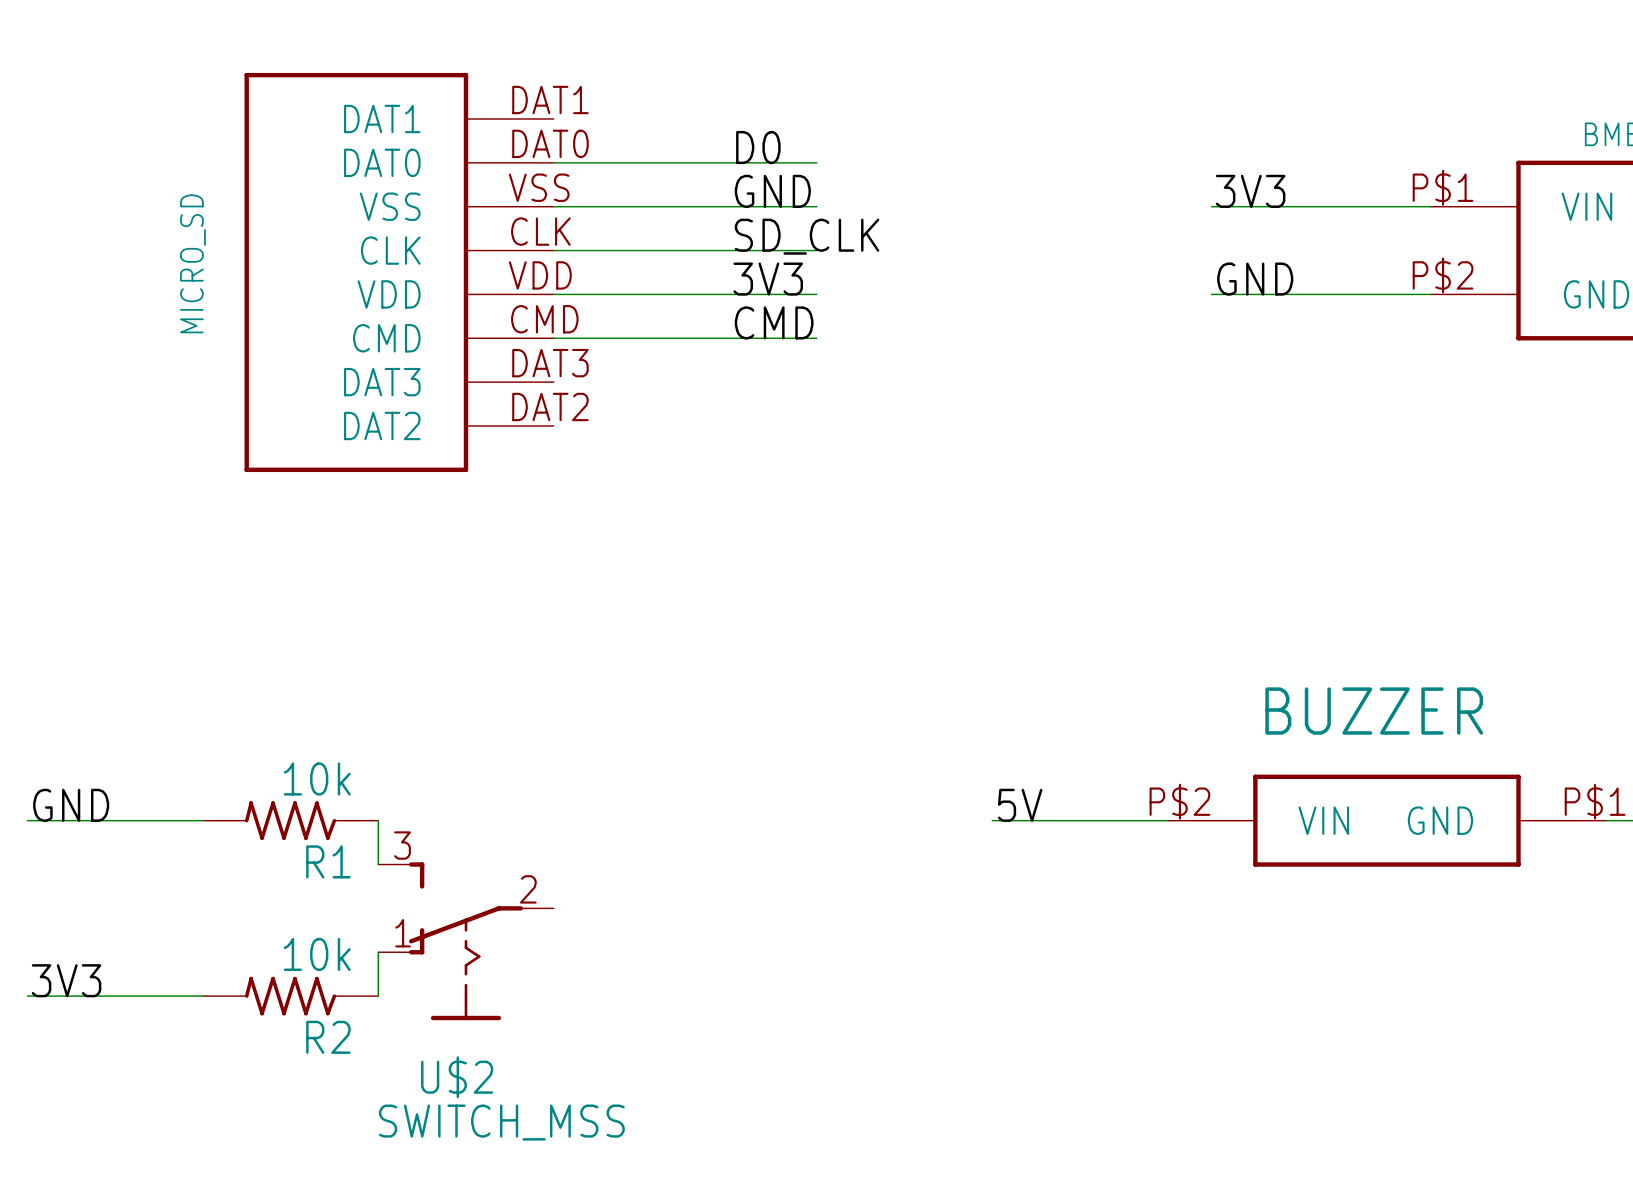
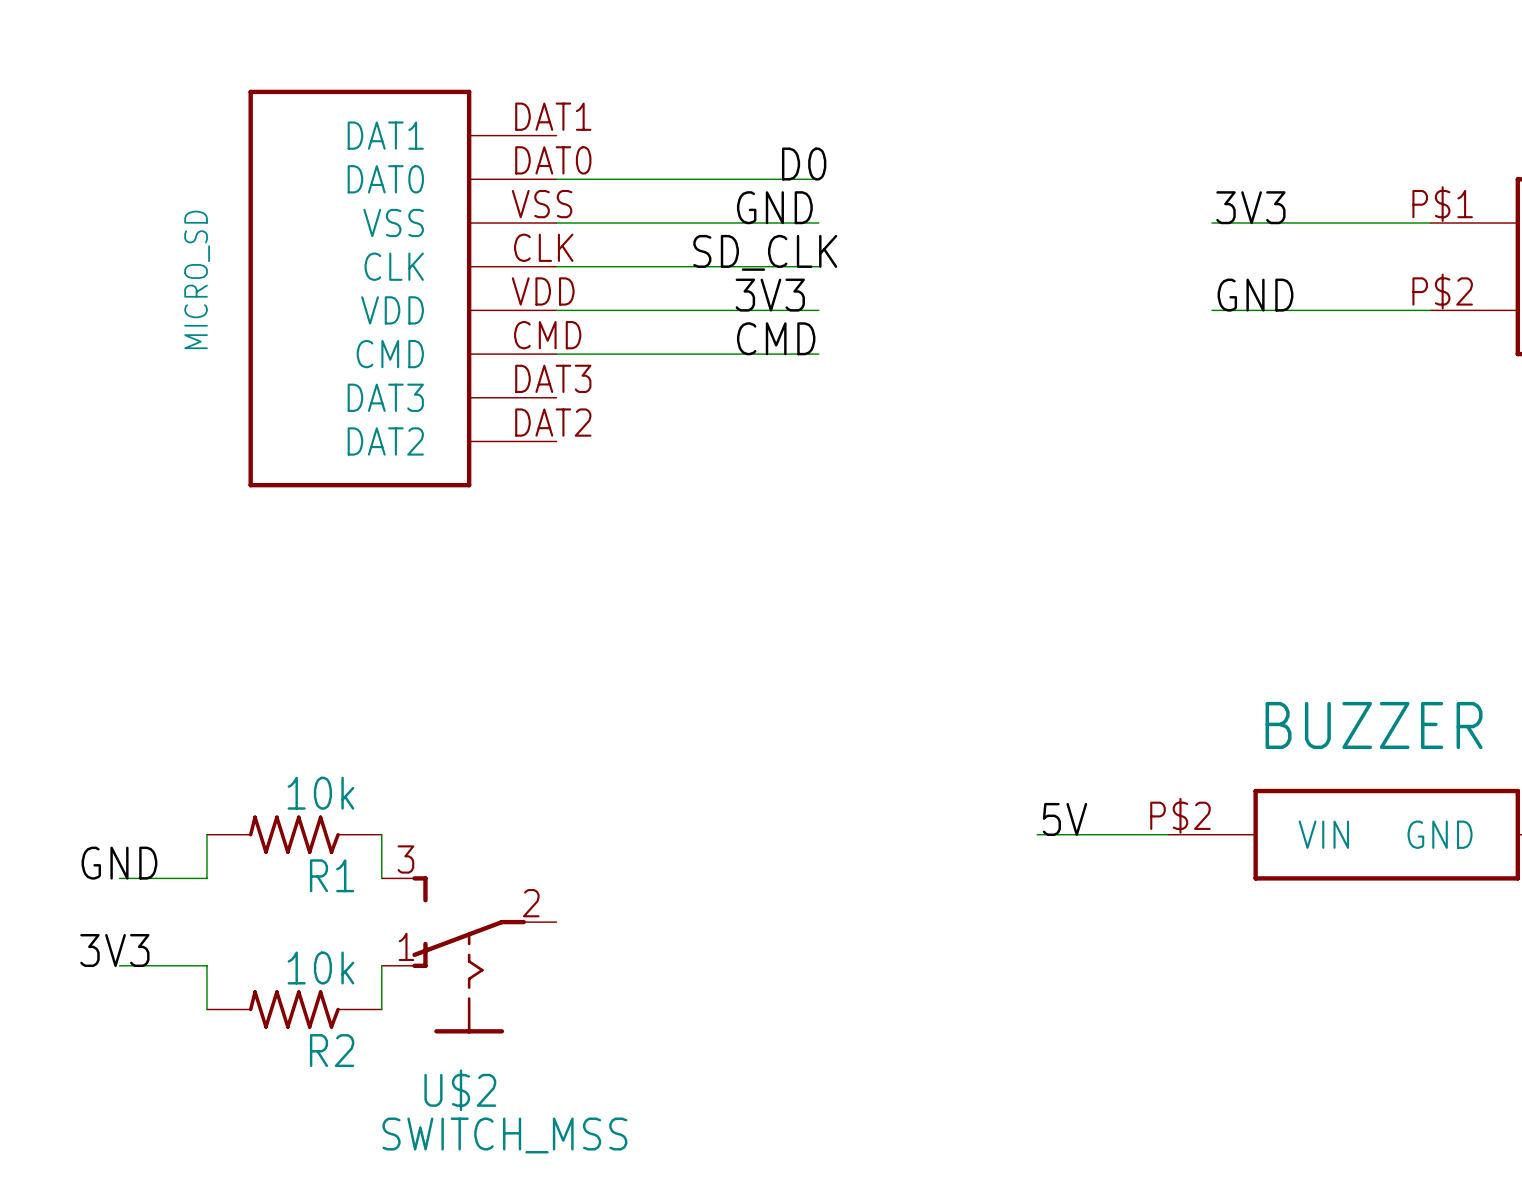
label position: D0 (758, 147) -> D0 (804, 164)
label position: SD_CLK (807, 236) -> SD_CLK (765, 252)
label position: GND (71, 805) -> GND (119, 863)
label position: 5V (1020, 805) -> 5V (1065, 819)
wire: (27, 820) (202, 820) -> (119, 878) (206, 878) (206, 834)
wire: (992, 820) (1036, 820) -> none
label position: 3V3 (66, 980) -> 3V3 (114, 950)
wire: (27, 996) (202, 996) -> (119, 965) (206, 965) (206, 1009)

